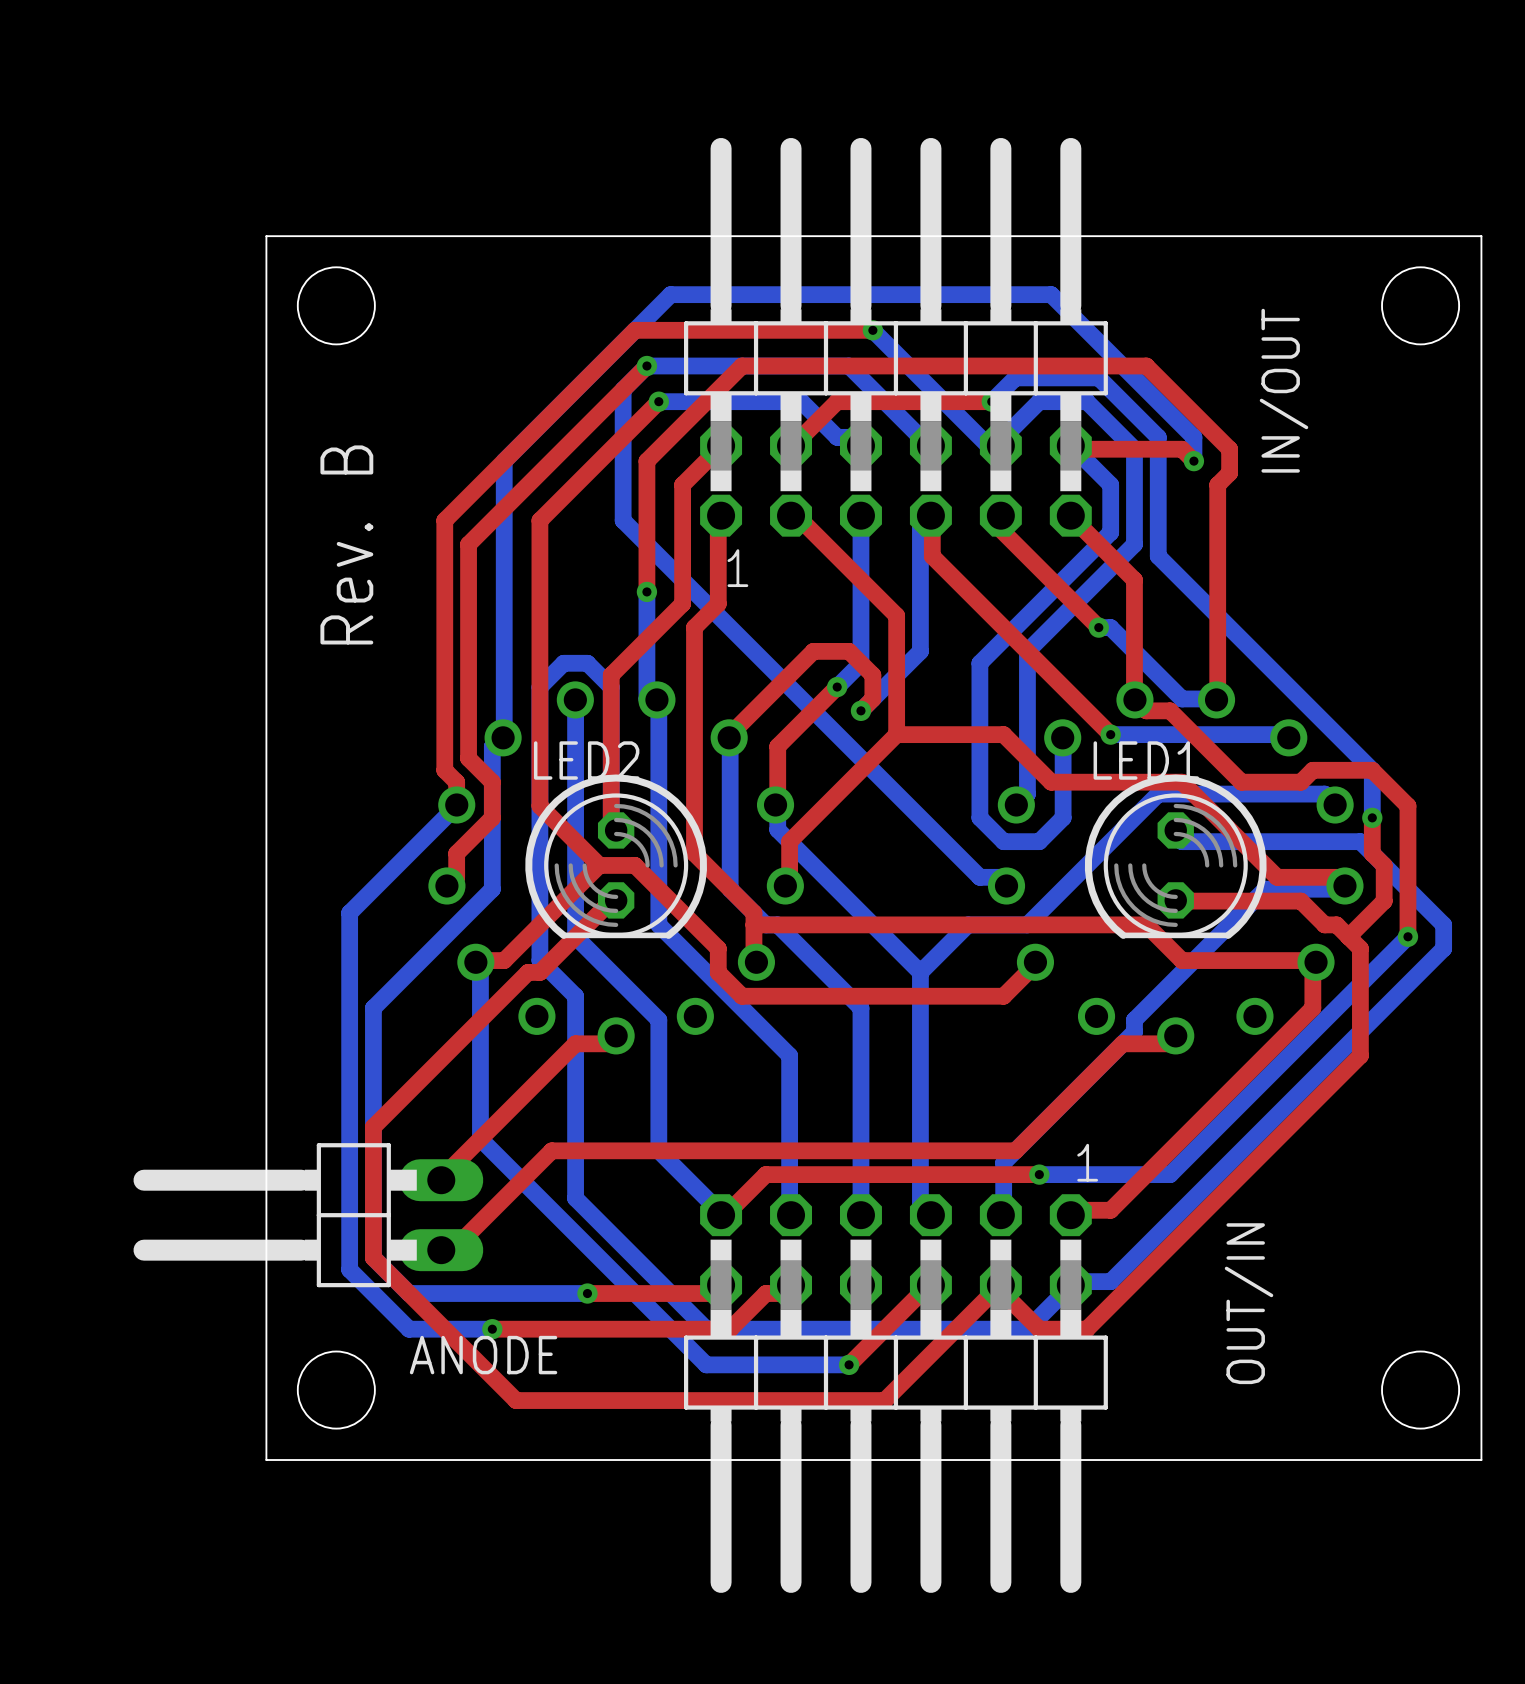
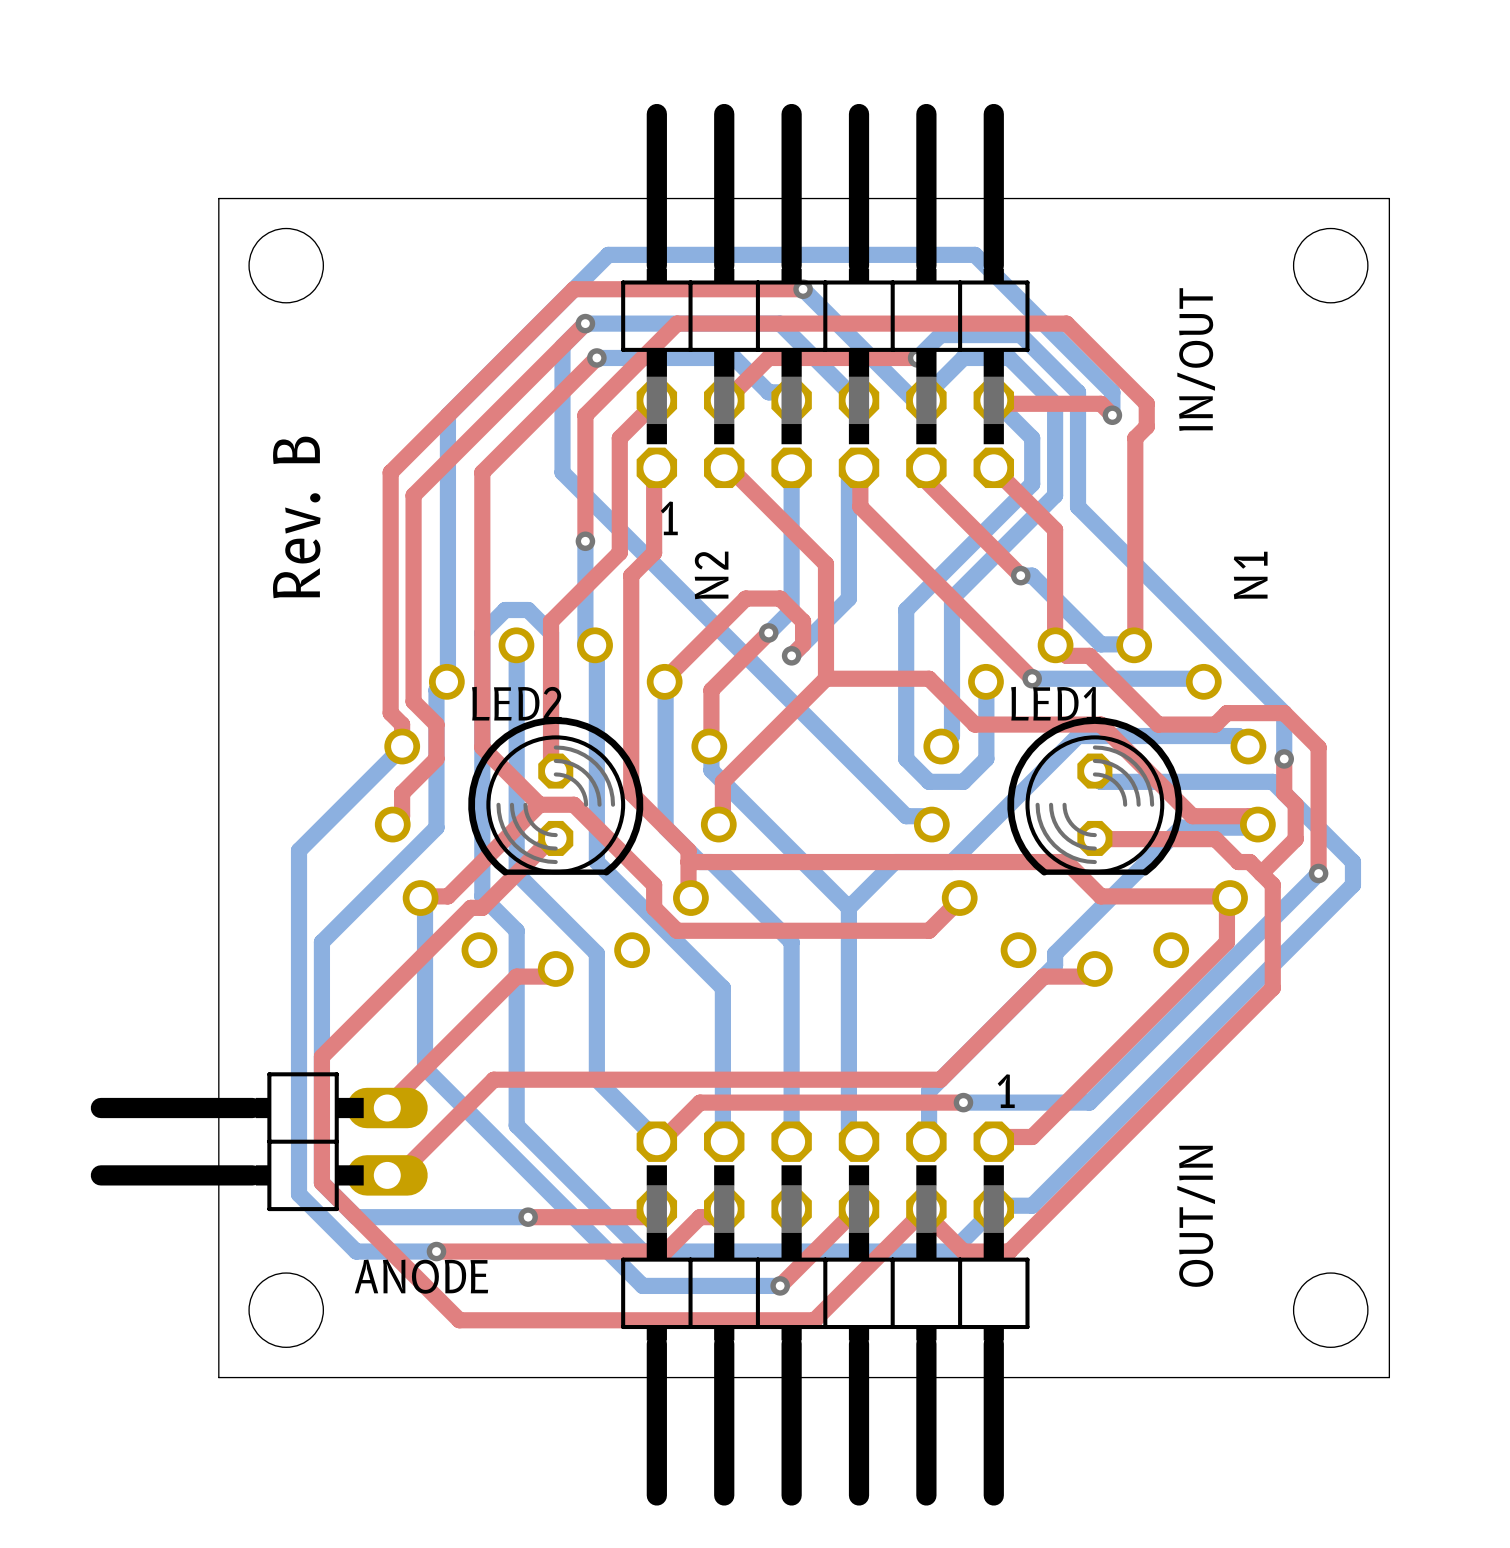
N2 name: none -> N2 (711, 575)
N1 name: none -> N1 (1250, 575)
OUT/IN name position: OUT/IN (1249, 1303) -> OUT/IN (1196, 1216)

